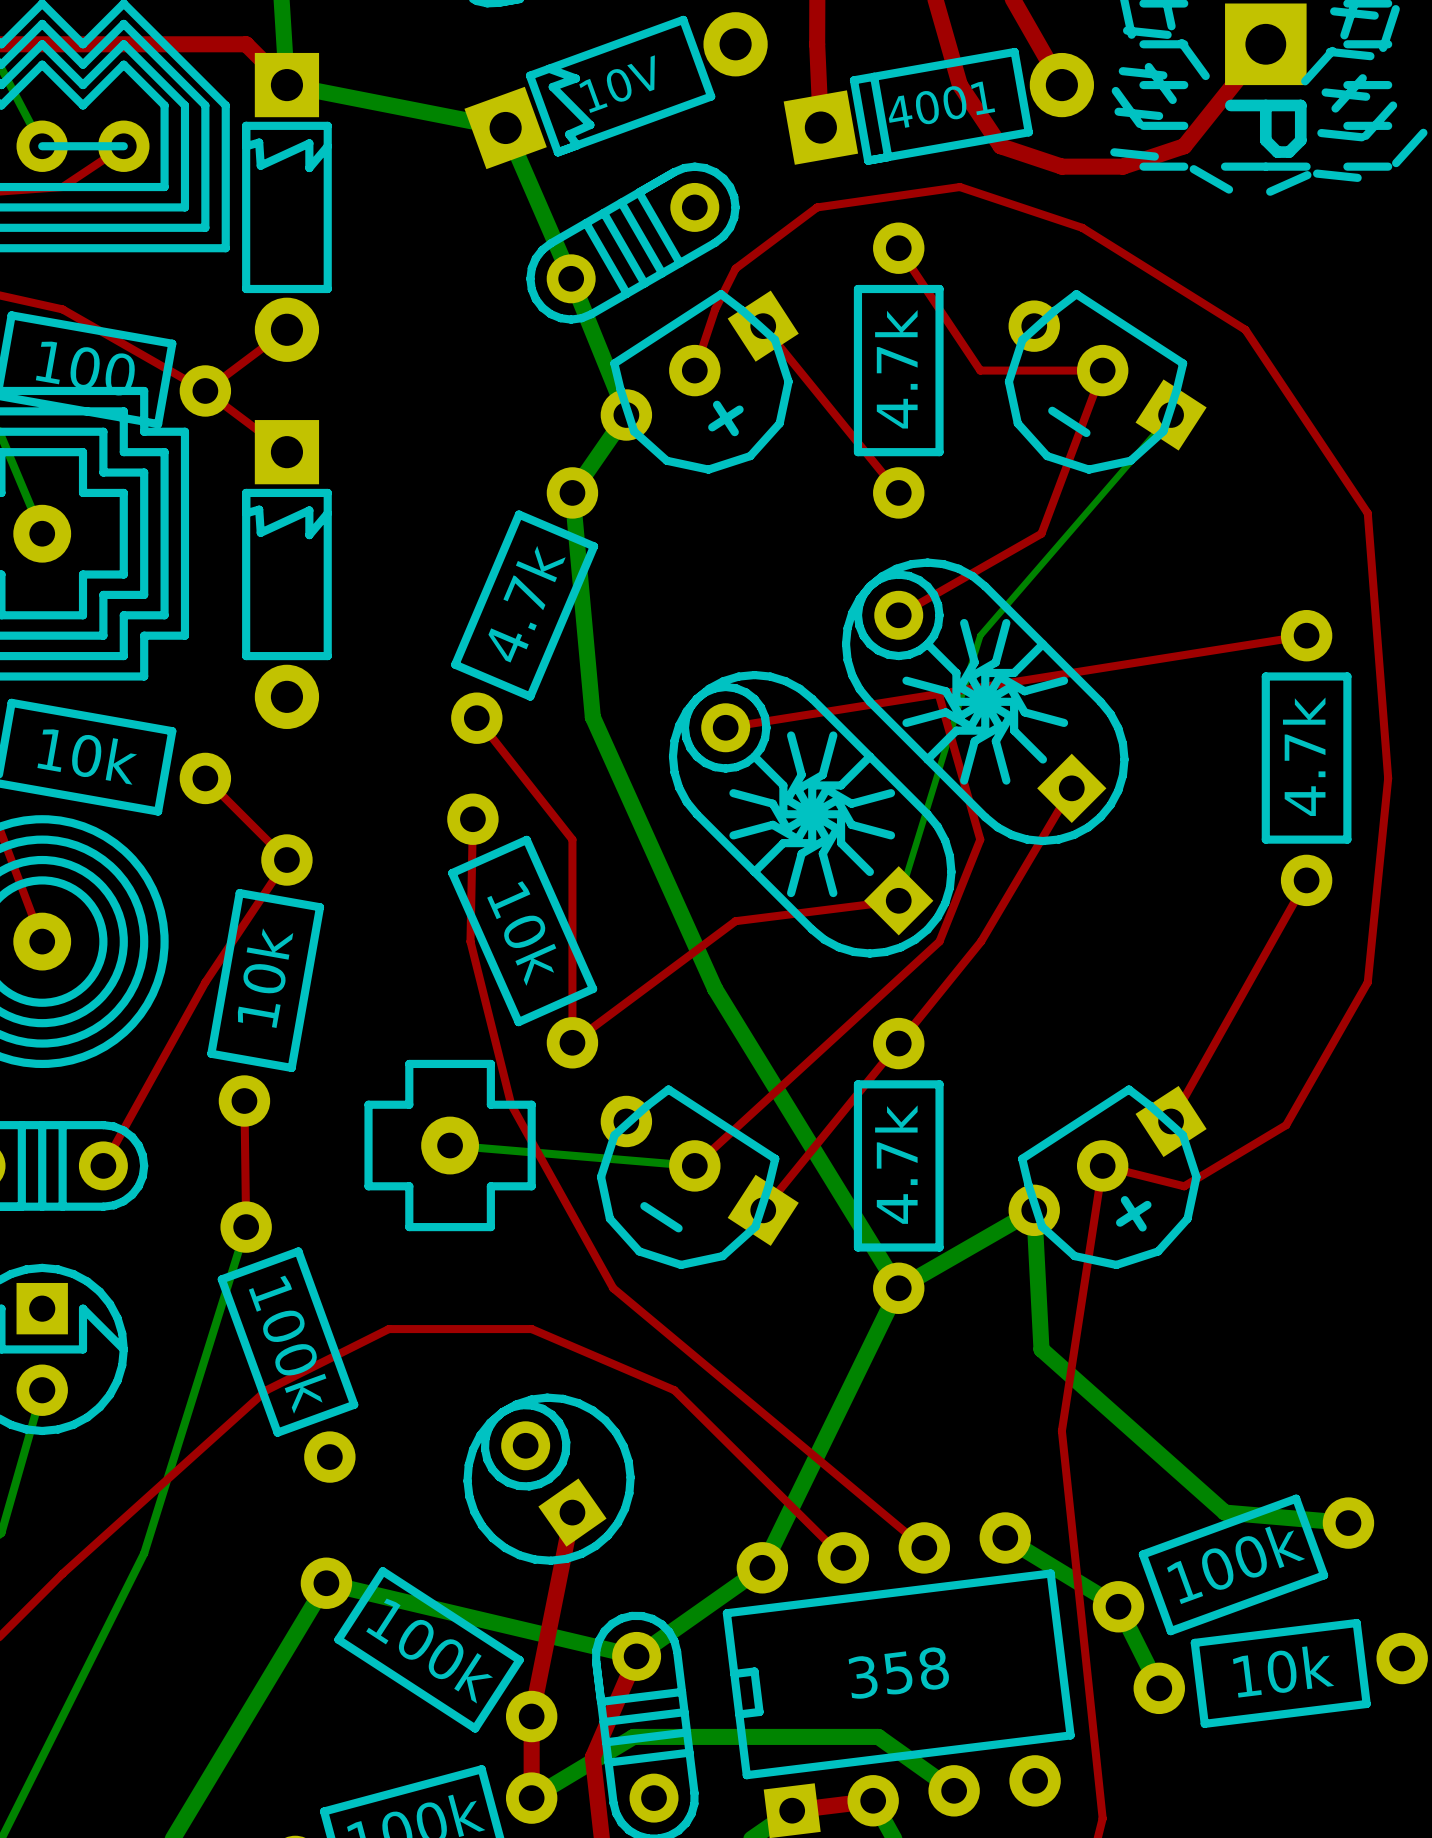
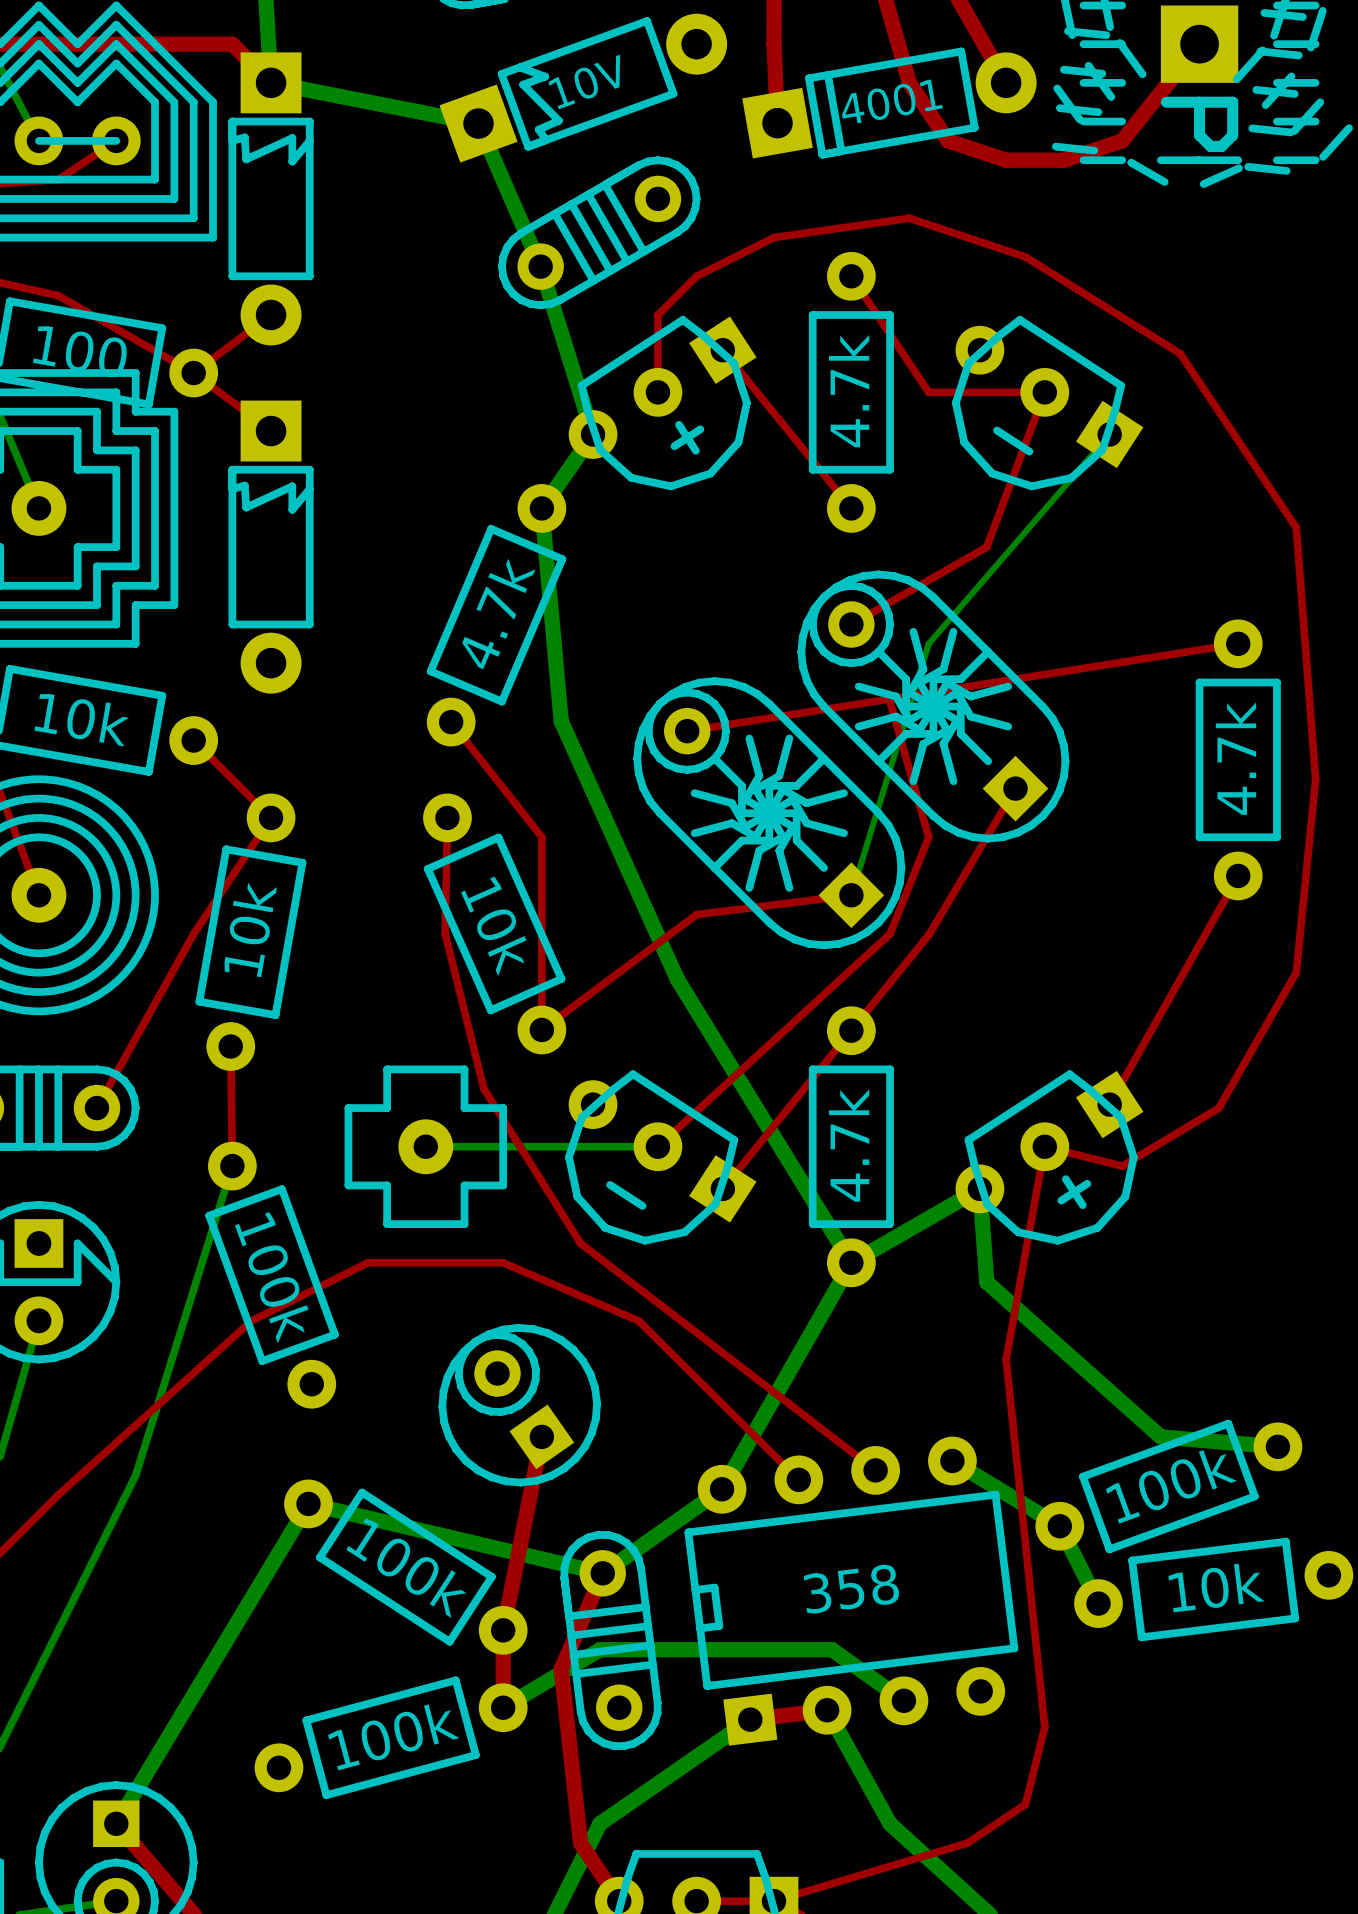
top track: (898, 248) (980, 370) (1102, 370) (1041, 533) (898, 615) -> (851, 276) (928, 392) (1044, 392) (986, 547) (851, 624)
bottom track: (571, 278) (626, 415) (572, 492) (592, 717) (715, 989) (898, 1288) -> (540, 266) (593, 434) (541, 508) (561, 721) (677, 979) (851, 1262)
top track: (763, 326) (898, 492) -> (722, 350) (851, 508)
top track: (694, 370) (715, 309) (735, 268) (817, 207) (959, 187) (1082, 227) (1245, 329) (1367, 513) (1388, 778) (1367, 982) (1286, 1125) (1184, 1186) (1102, 1165) (1061, 1431) -> (657, 392) (657, 314) (696, 276) (774, 237) (909, 218) (1025, 256) (1180, 353) (1296, 527) (1315, 779) (1296, 972) (1218, 1108) (1122, 1166) (1044, 1146) (1006, 1359)
part position: (898, 370) -> (851, 392)
part position: (699, 381) -> (662, 403)
part position: (1105, 381) -> (1047, 403)
bottom track: (1171, 415) (980, 635) (898, 900) -> (1109, 434) (928, 643) (851, 895)
part position: (524, 605) -> (496, 615)
top track: (1306, 635) (725, 727) -> (1238, 643) (687, 731)
top track: (939, 696) (980, 839) (939, 941) (694, 1165) -> (890, 701) (928, 837) (890, 933) (657, 1146)
part position: (985, 701) -> (933, 706)
top track: (476, 718) (572, 839) (572, 880) -> (451, 722) (541, 837)
part position: (1306, 758) -> (1238, 759)
top track: (1071, 788) (981, 941) (763, 1210) -> (1015, 788) (929, 933) (722, 1188)
part position: (812, 814) -> (769, 813)
top track: (472, 819) (470, 941) (511, 1104) (613, 1288) (924, 1547) -> (447, 817) (445, 933) (483, 1088) (580, 1243) (875, 1470)
top track: (1306, 880) (1171, 1121) -> (1238, 875) (1109, 1104)
top track: (898, 900) (735, 921) (572, 1042) -> (851, 895) (696, 914) (541, 1029) (541, 991)
part position: (522, 931) -> (494, 923)
bottom track: (450, 1145) (694, 1165) -> none
part position: (450, 1145) -> (425, 1146)
part position: (898, 1165) -> (851, 1146)
part position: (697, 1177) -> (660, 1157)
part position: (1107, 1177) -> (1049, 1157)
bottom track: none -> (425, 1146) (657, 1146)
bottom track: (898, 1288) (762, 1567) -> (851, 1262) (722, 1489)
bottom track: (898, 1288) (1034, 1210) (1041, 1349) -> (851, 1262) (979, 1188) (986, 1282)

